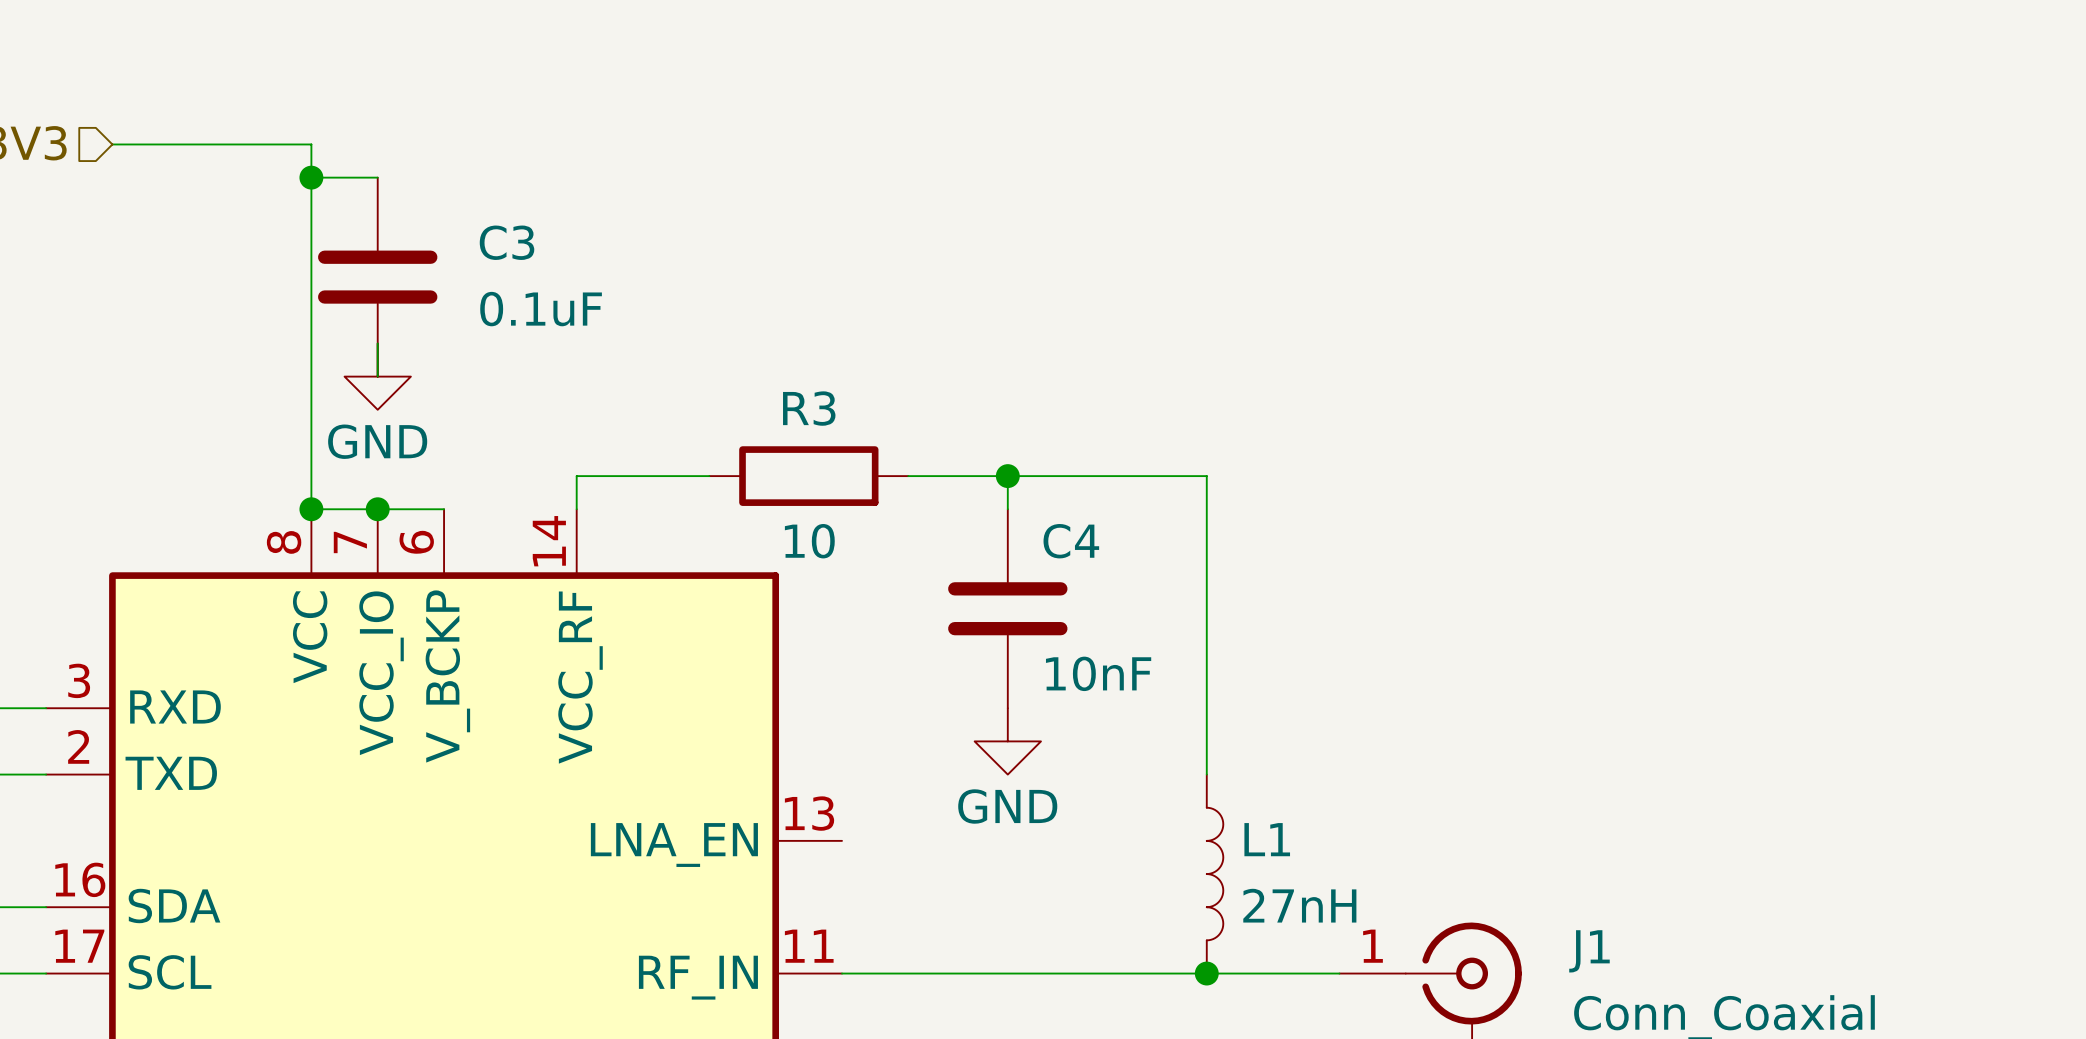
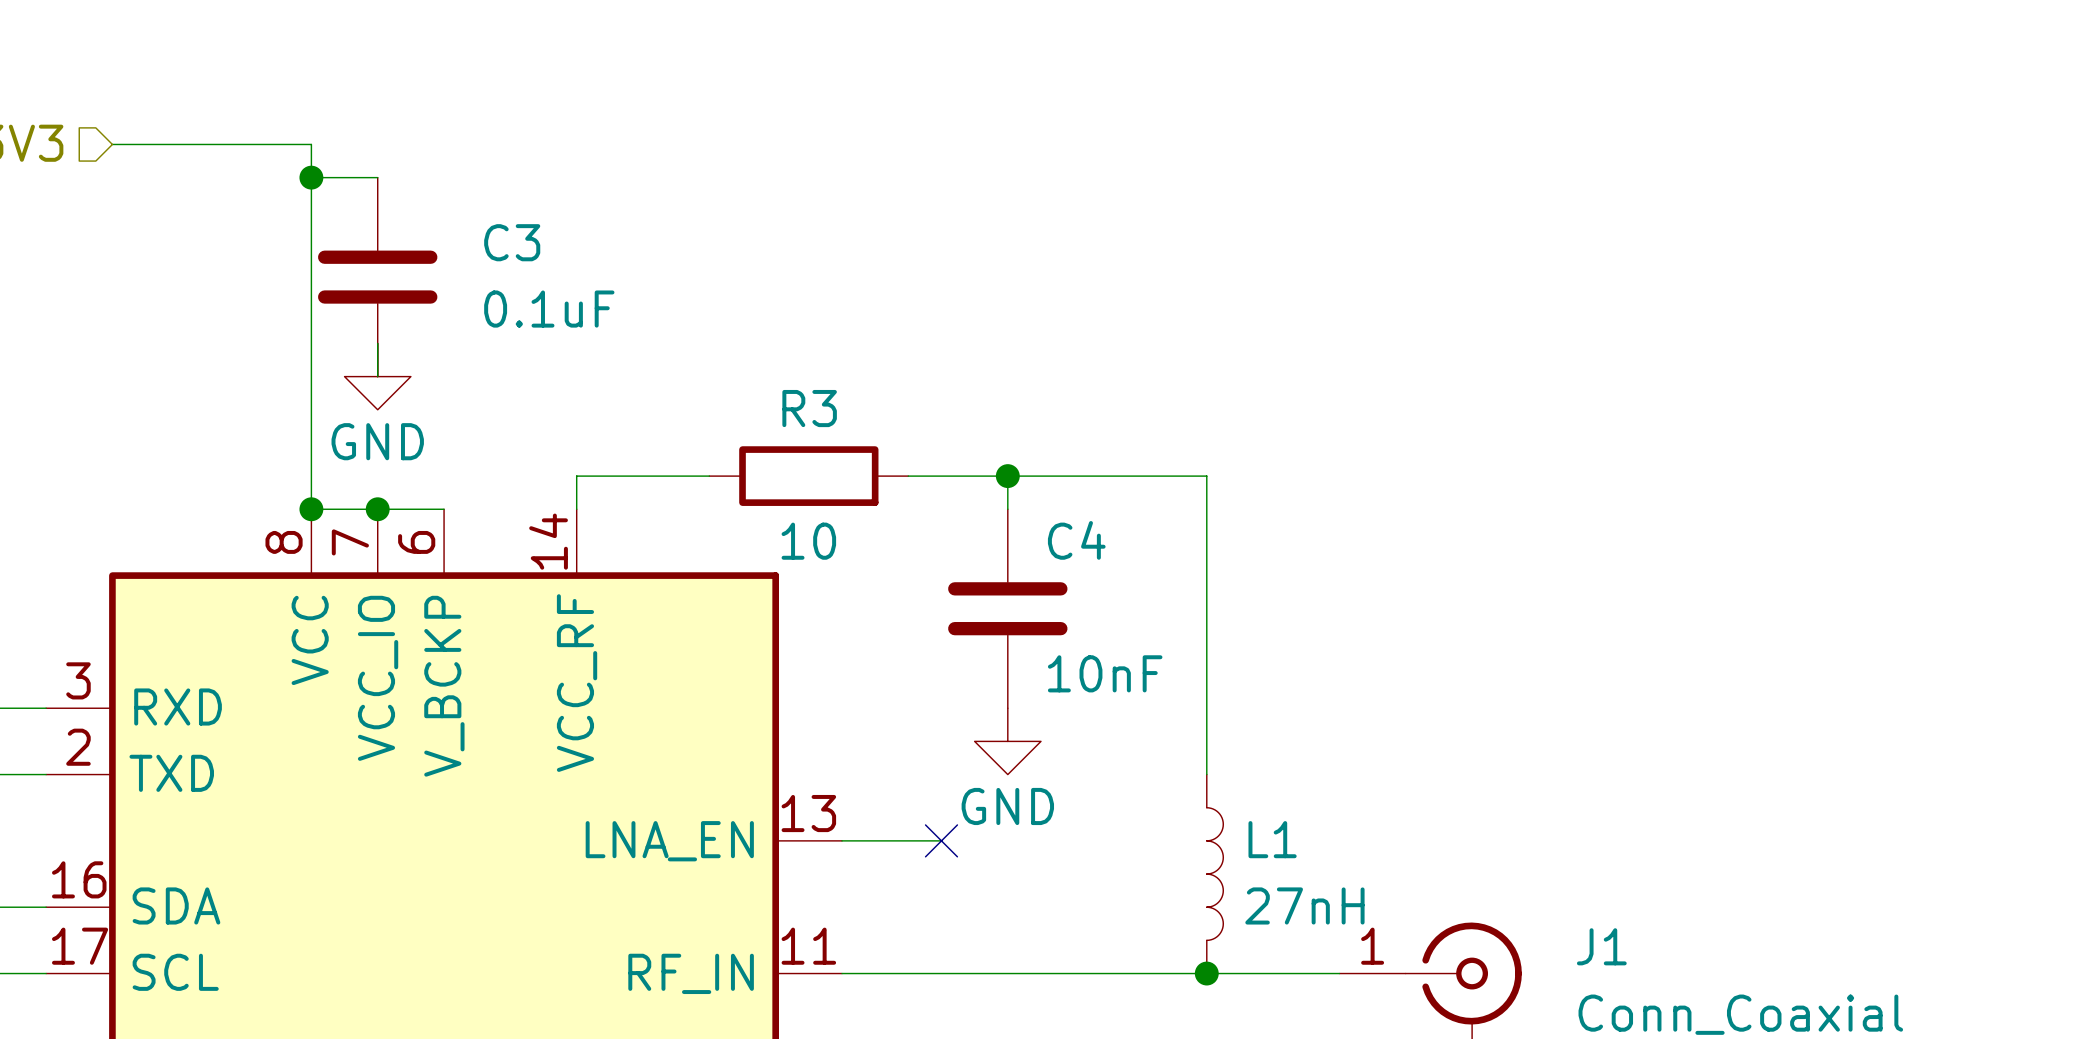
wire: none -> (842, 840) (941, 840)
no-connect mark: none -> (941, 840)

